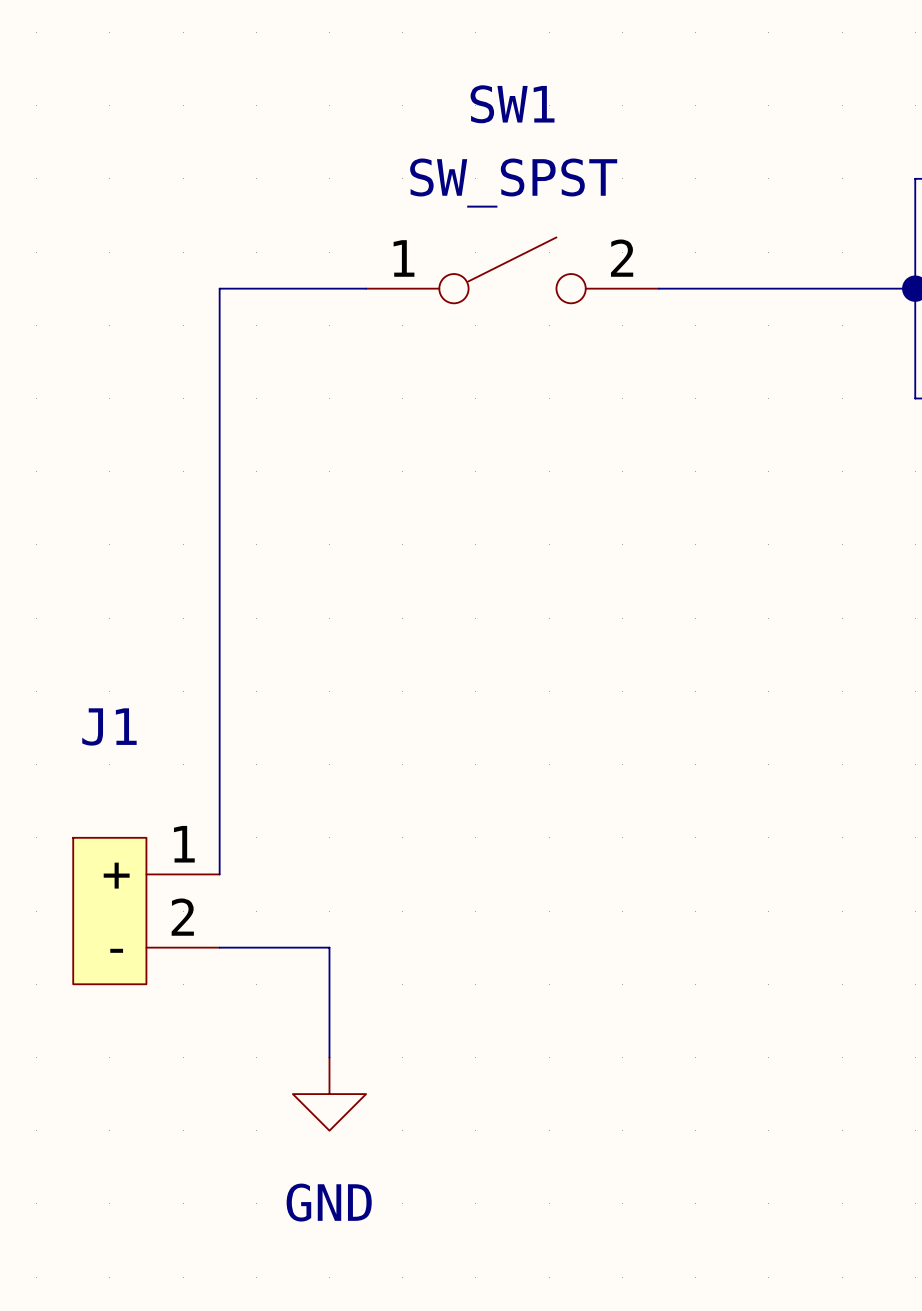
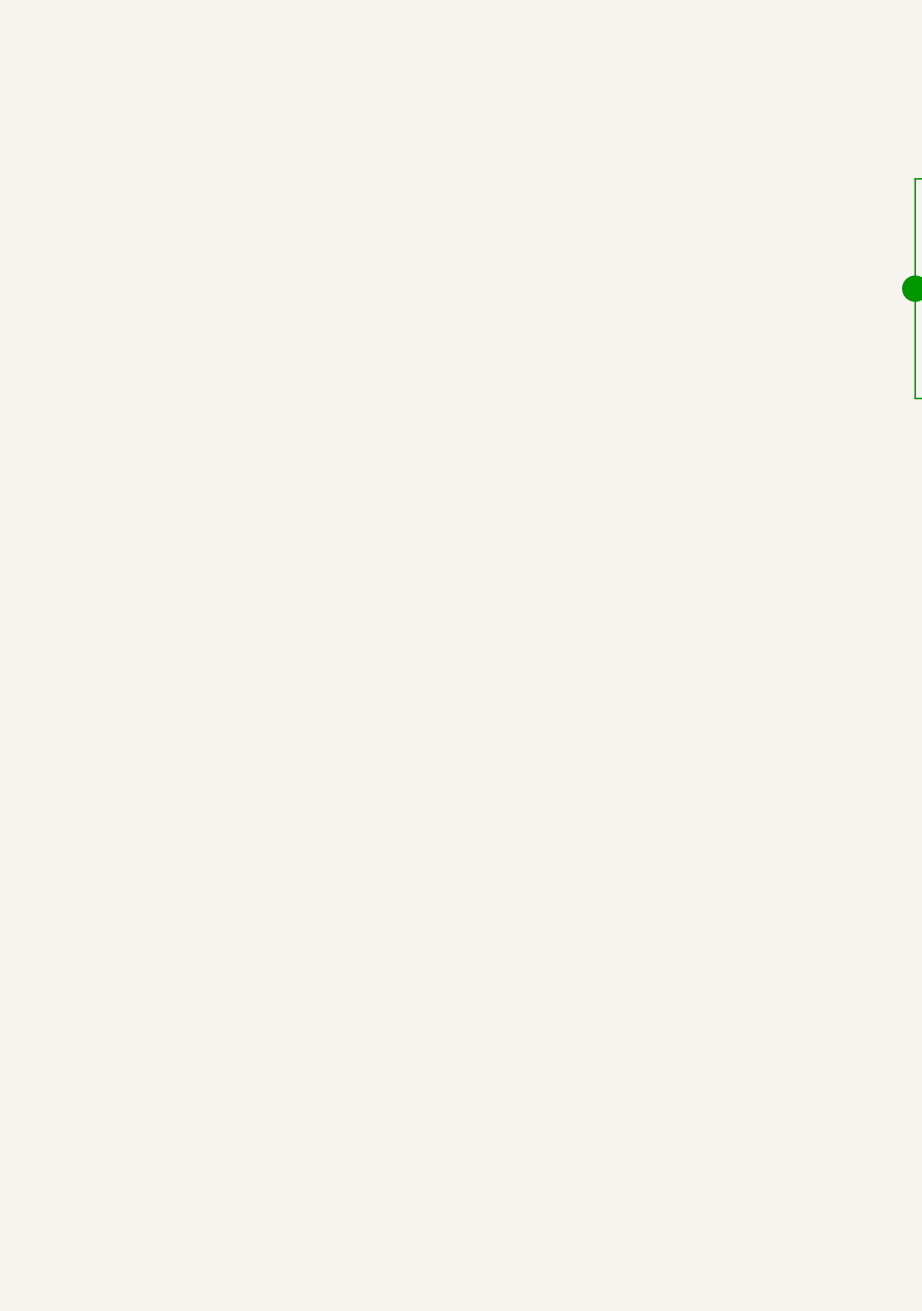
SW1: SW_SPST (512, 270) -> none
wire: (366, 288) (219, 288) (219, 874) -> none
wire: (658, 288) (915, 288) -> none
J1: (146, 911) -> none
wire: (219, 947) (329, 947) (329, 1057) -> none
power symbol: GND (329, 1094) -> none

